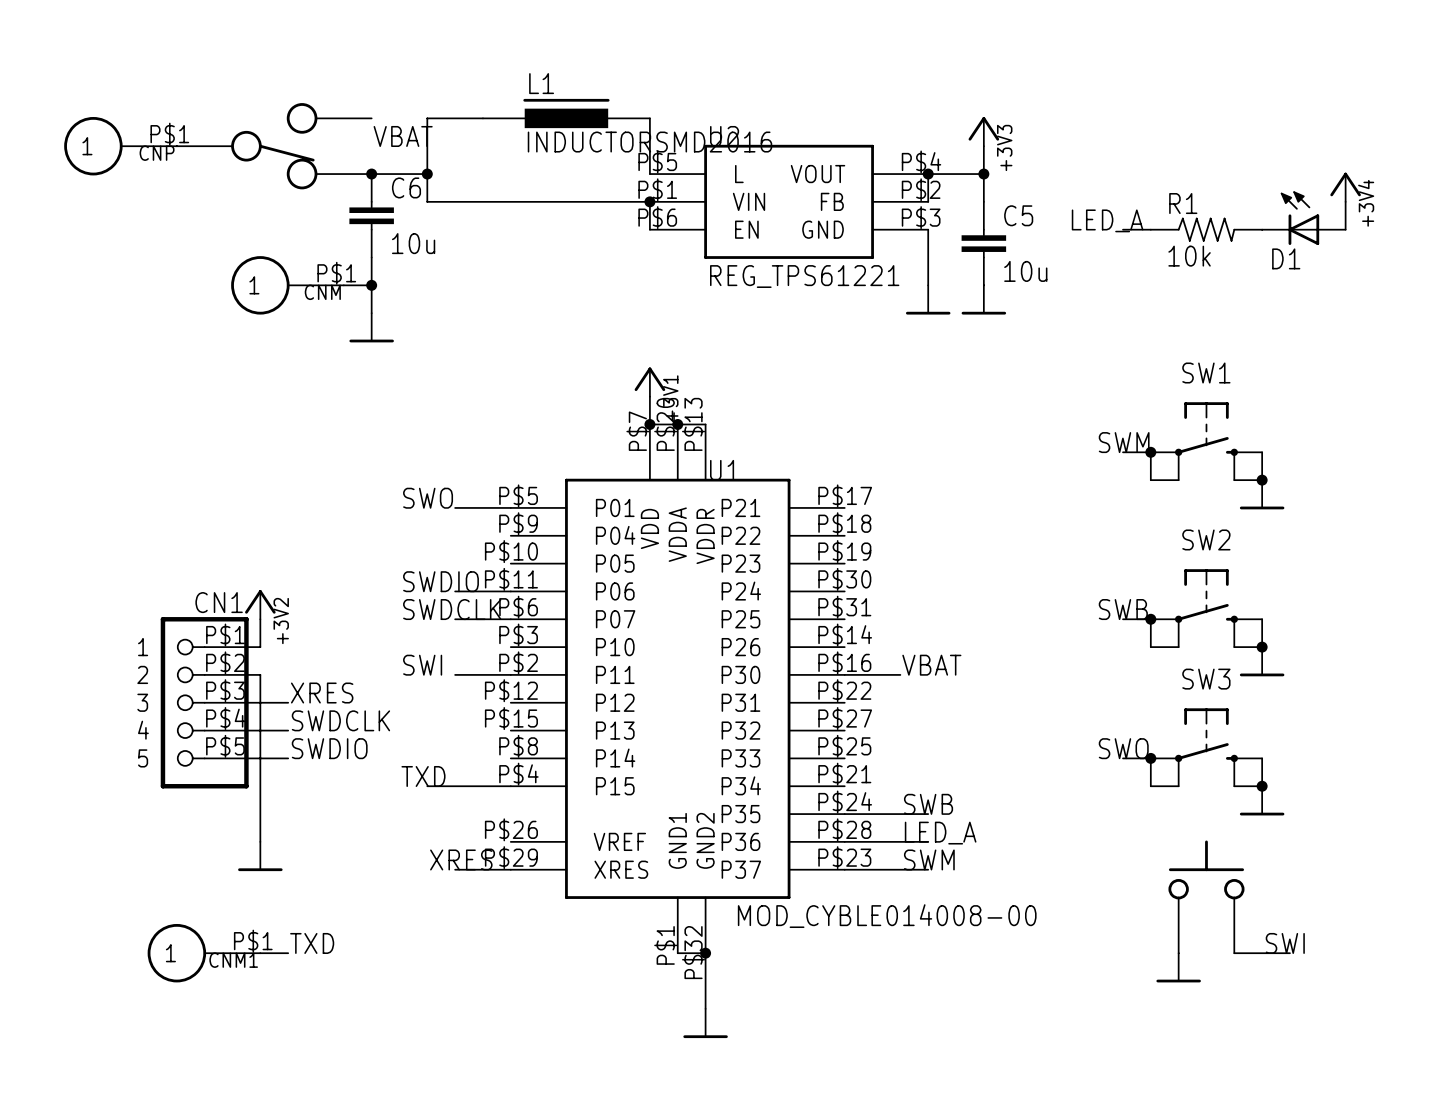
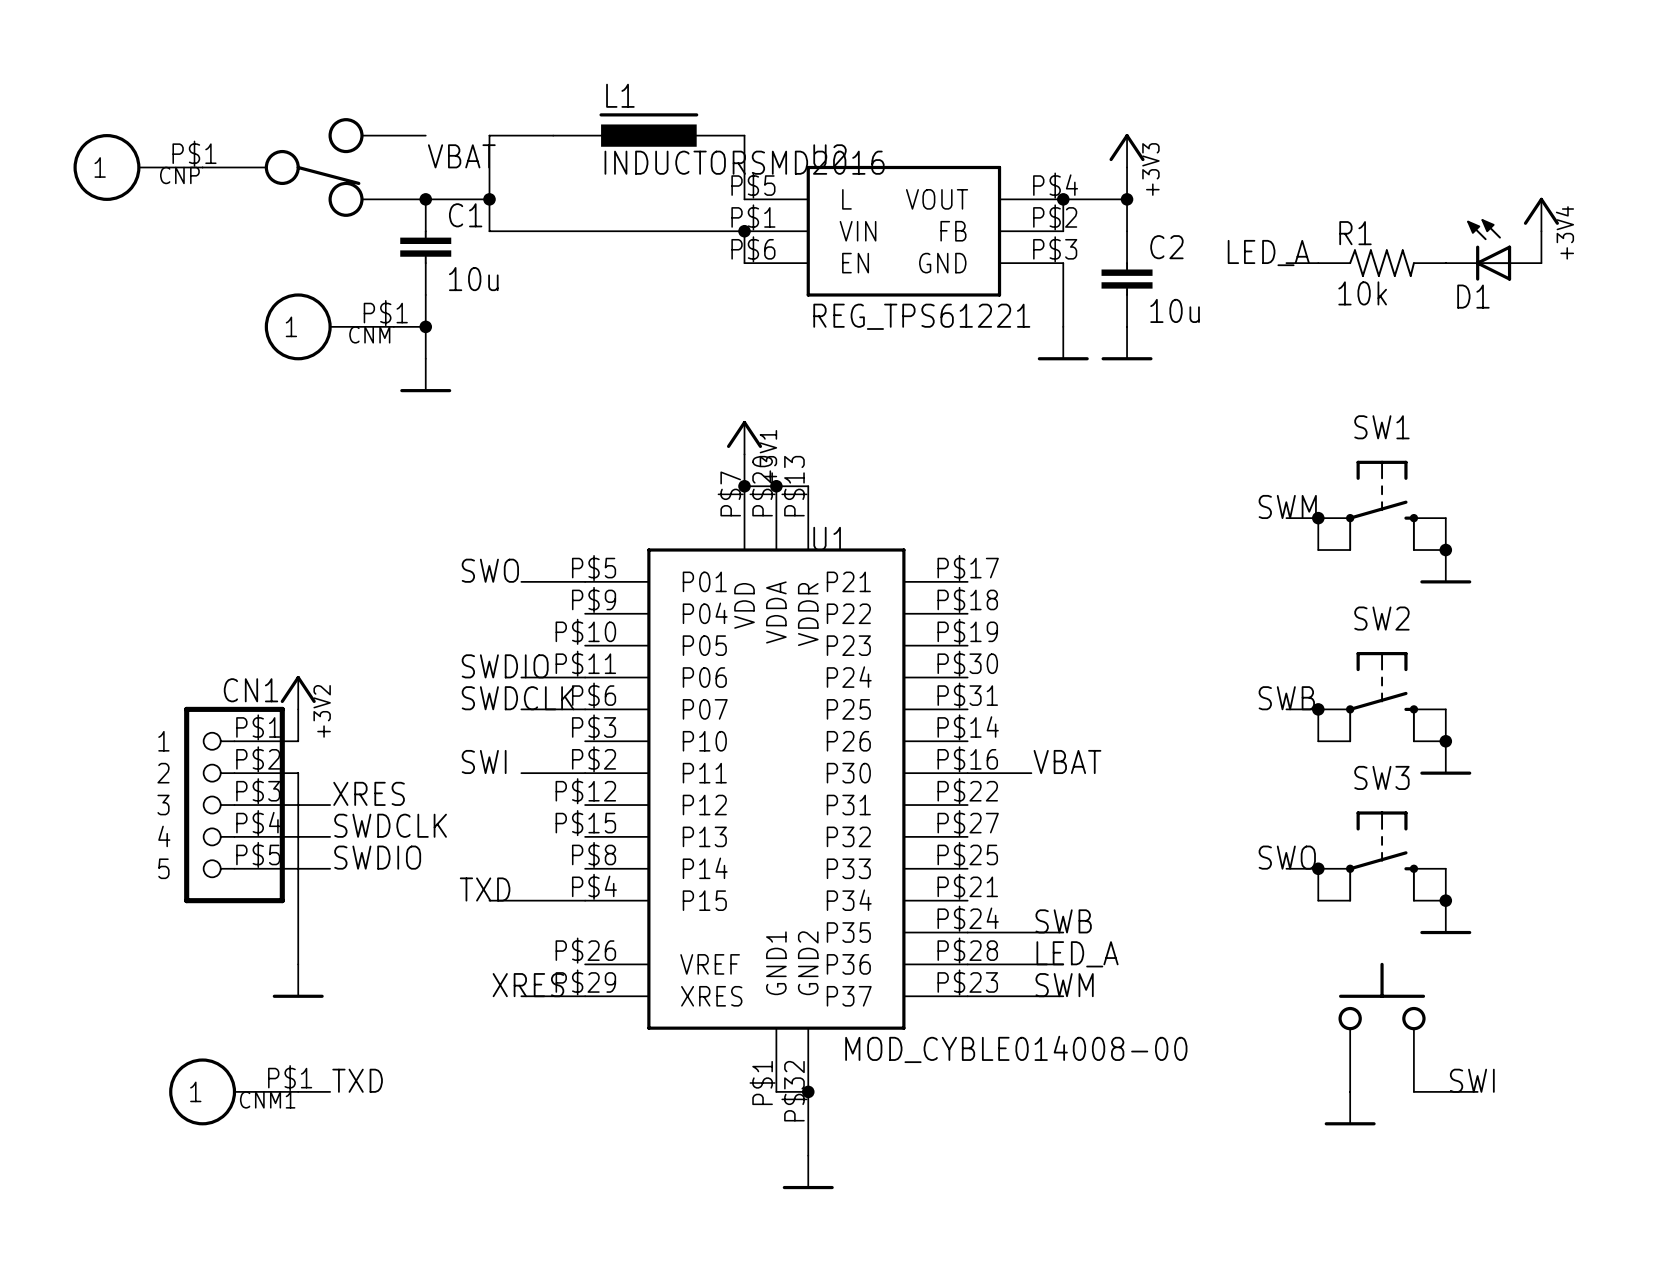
C6 name: C6 (406, 187) -> C1 (465, 215)
C5 name: C5 (1018, 215) -> C2 (1166, 247)

